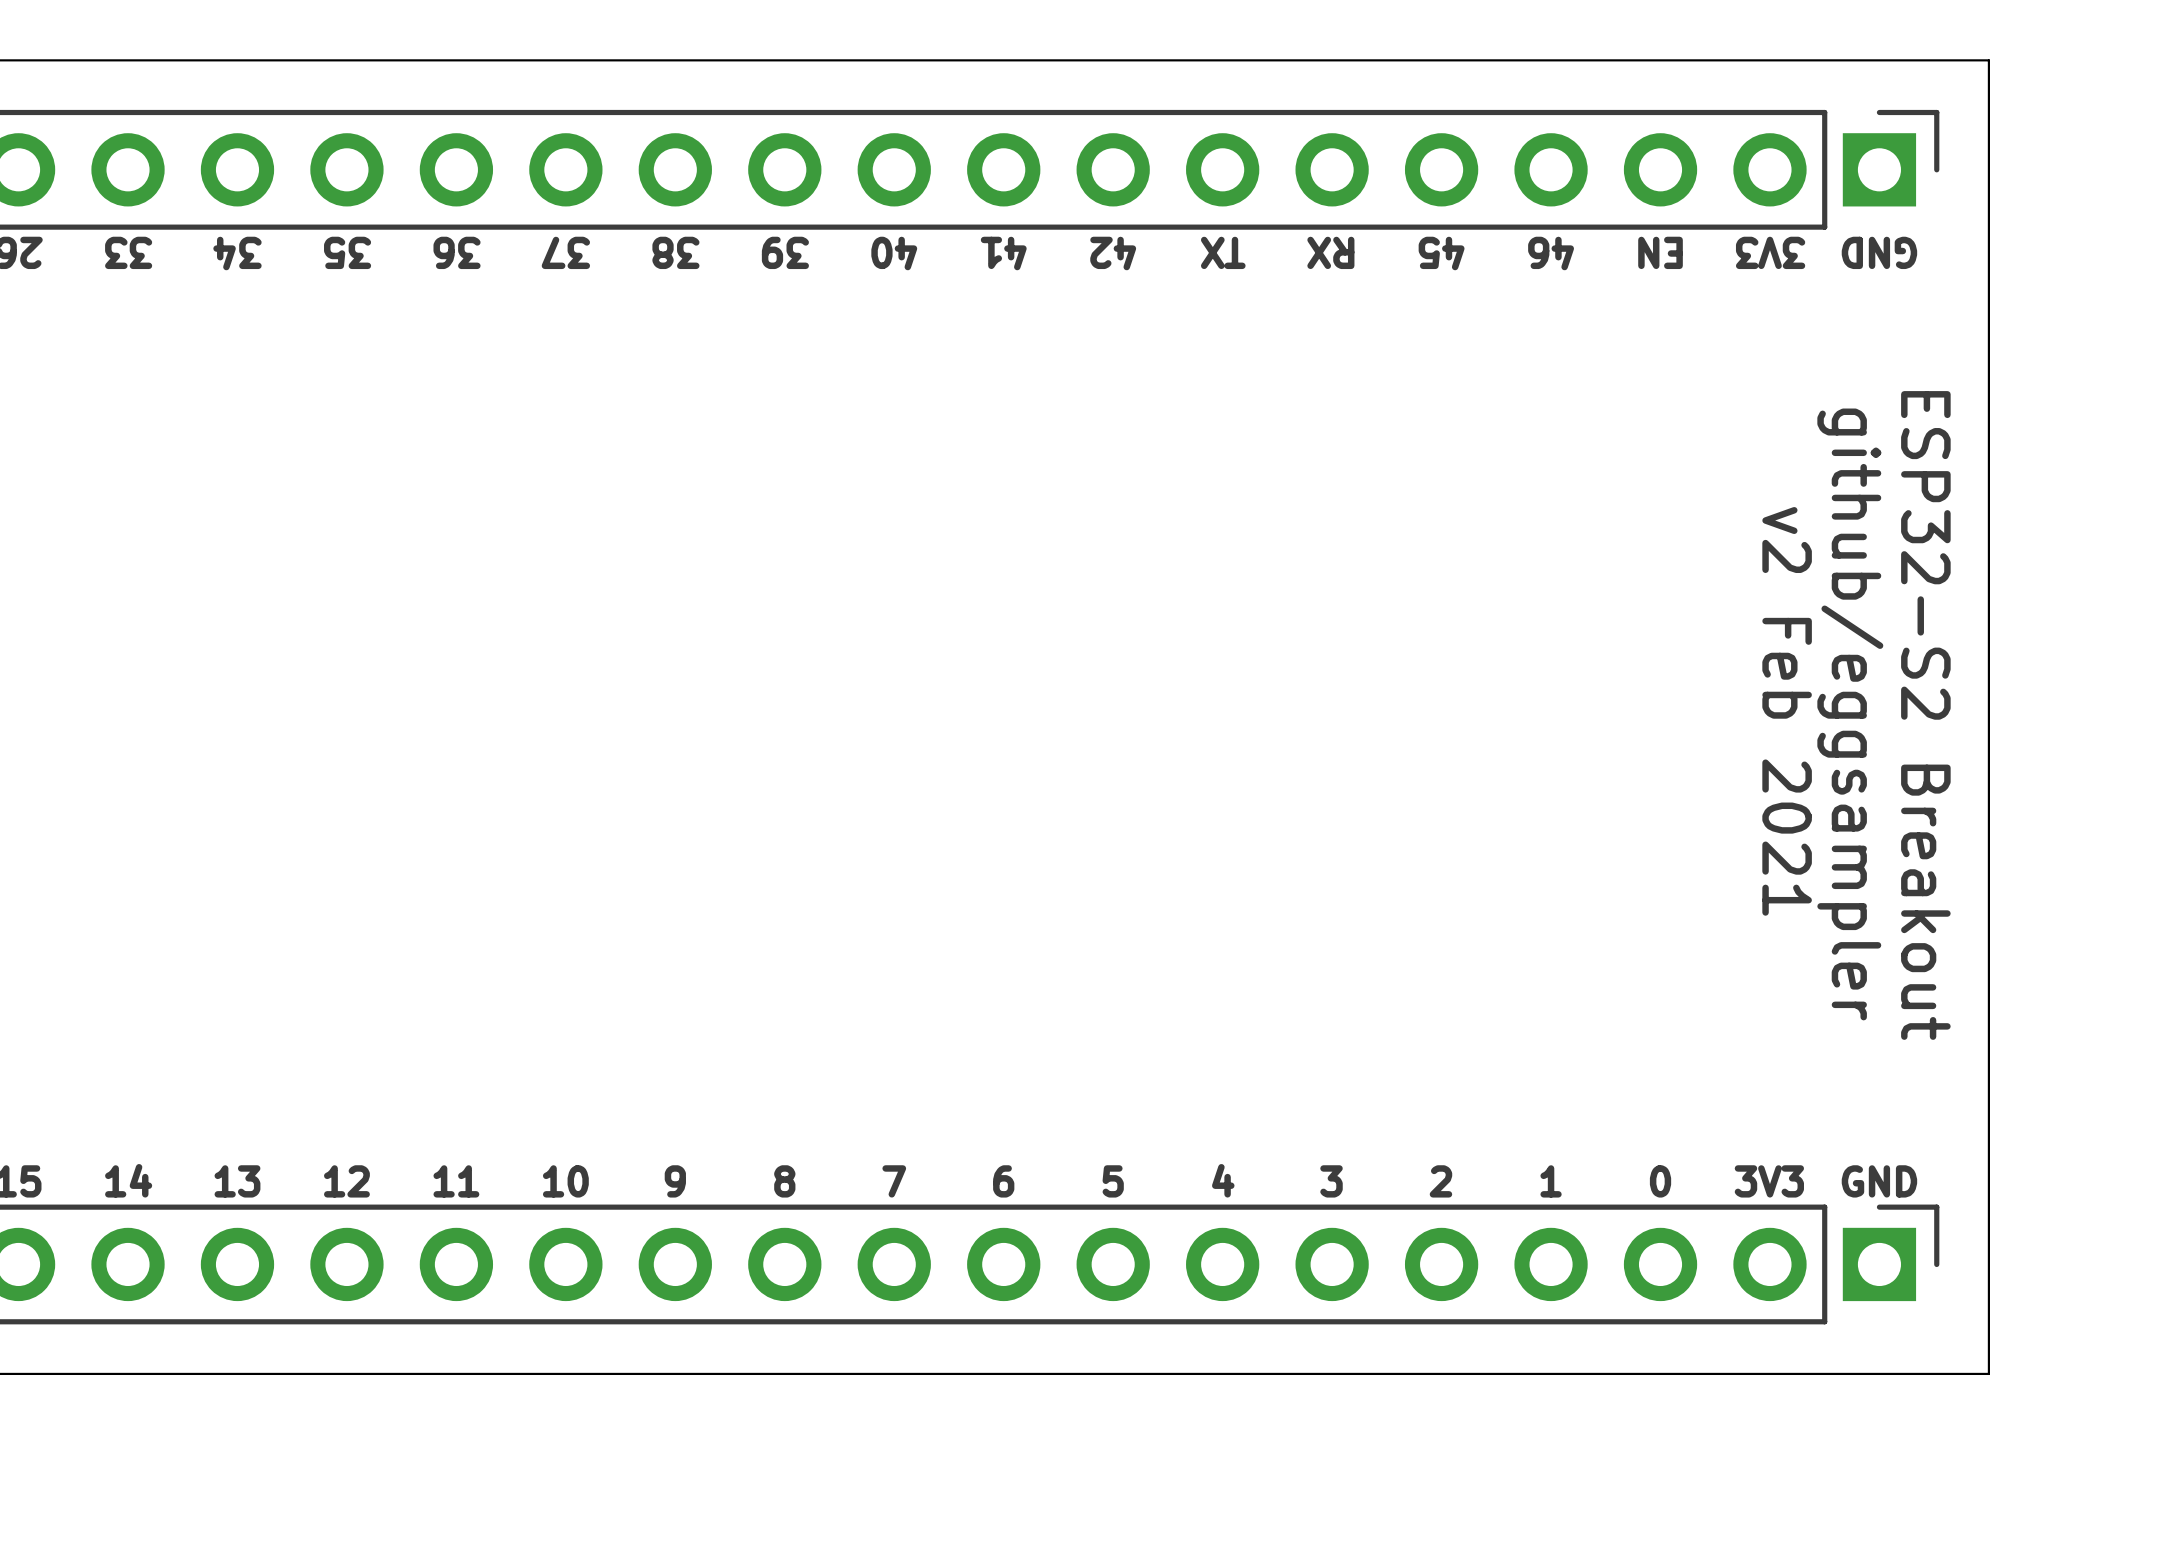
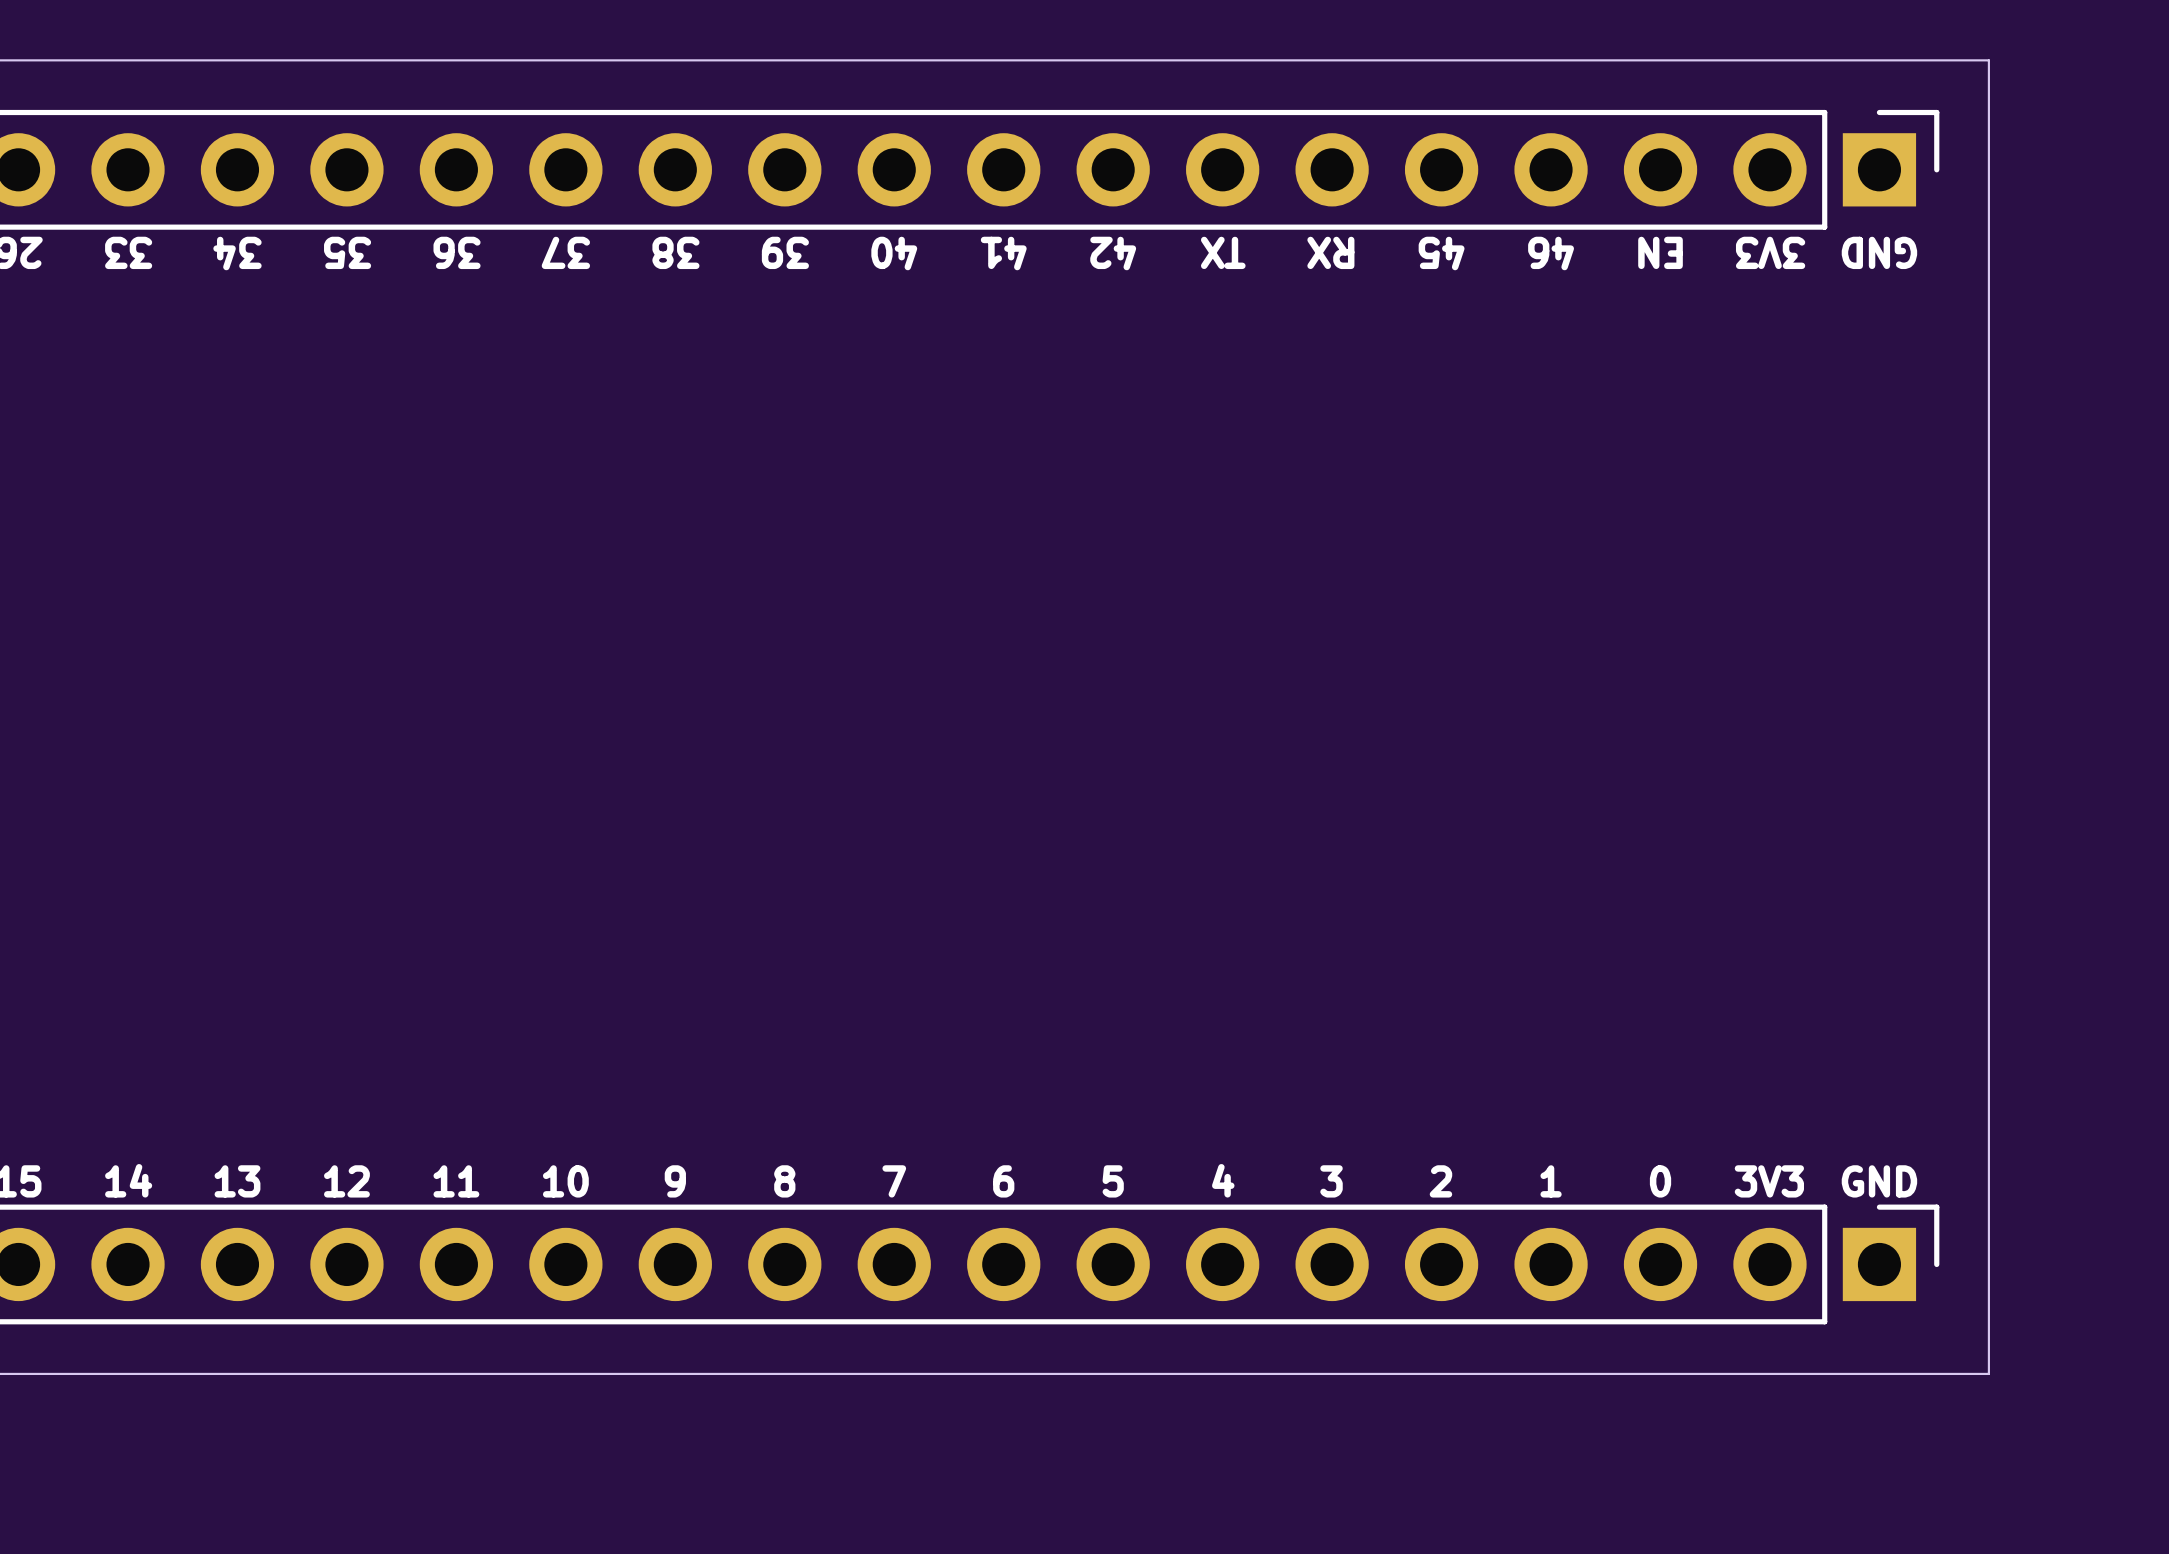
text: v2 Feb 2021 (1787, 711) -> none
text: github/eggsampler (1850, 714) -> none
text: ESP32-S2 Breakout (1925, 715) -> none

